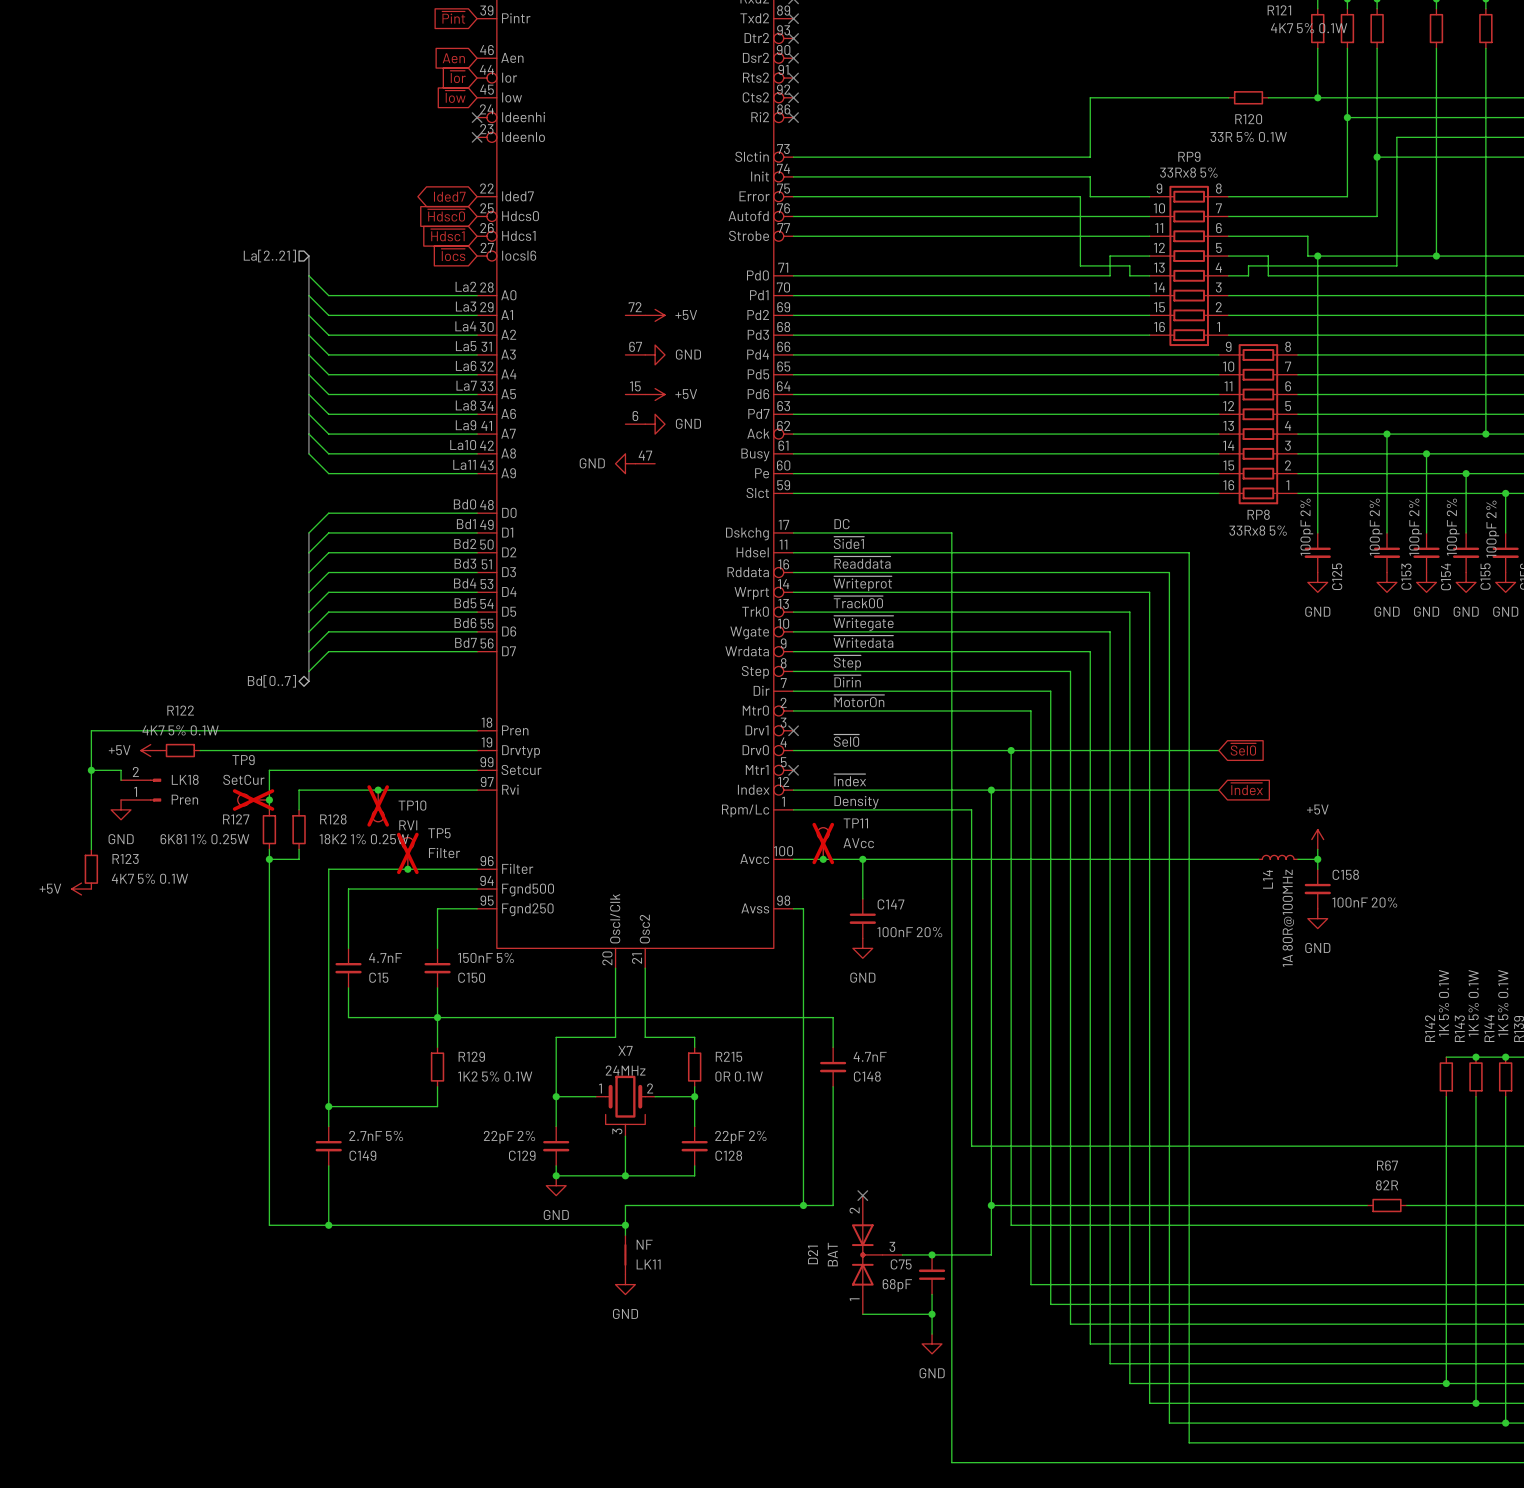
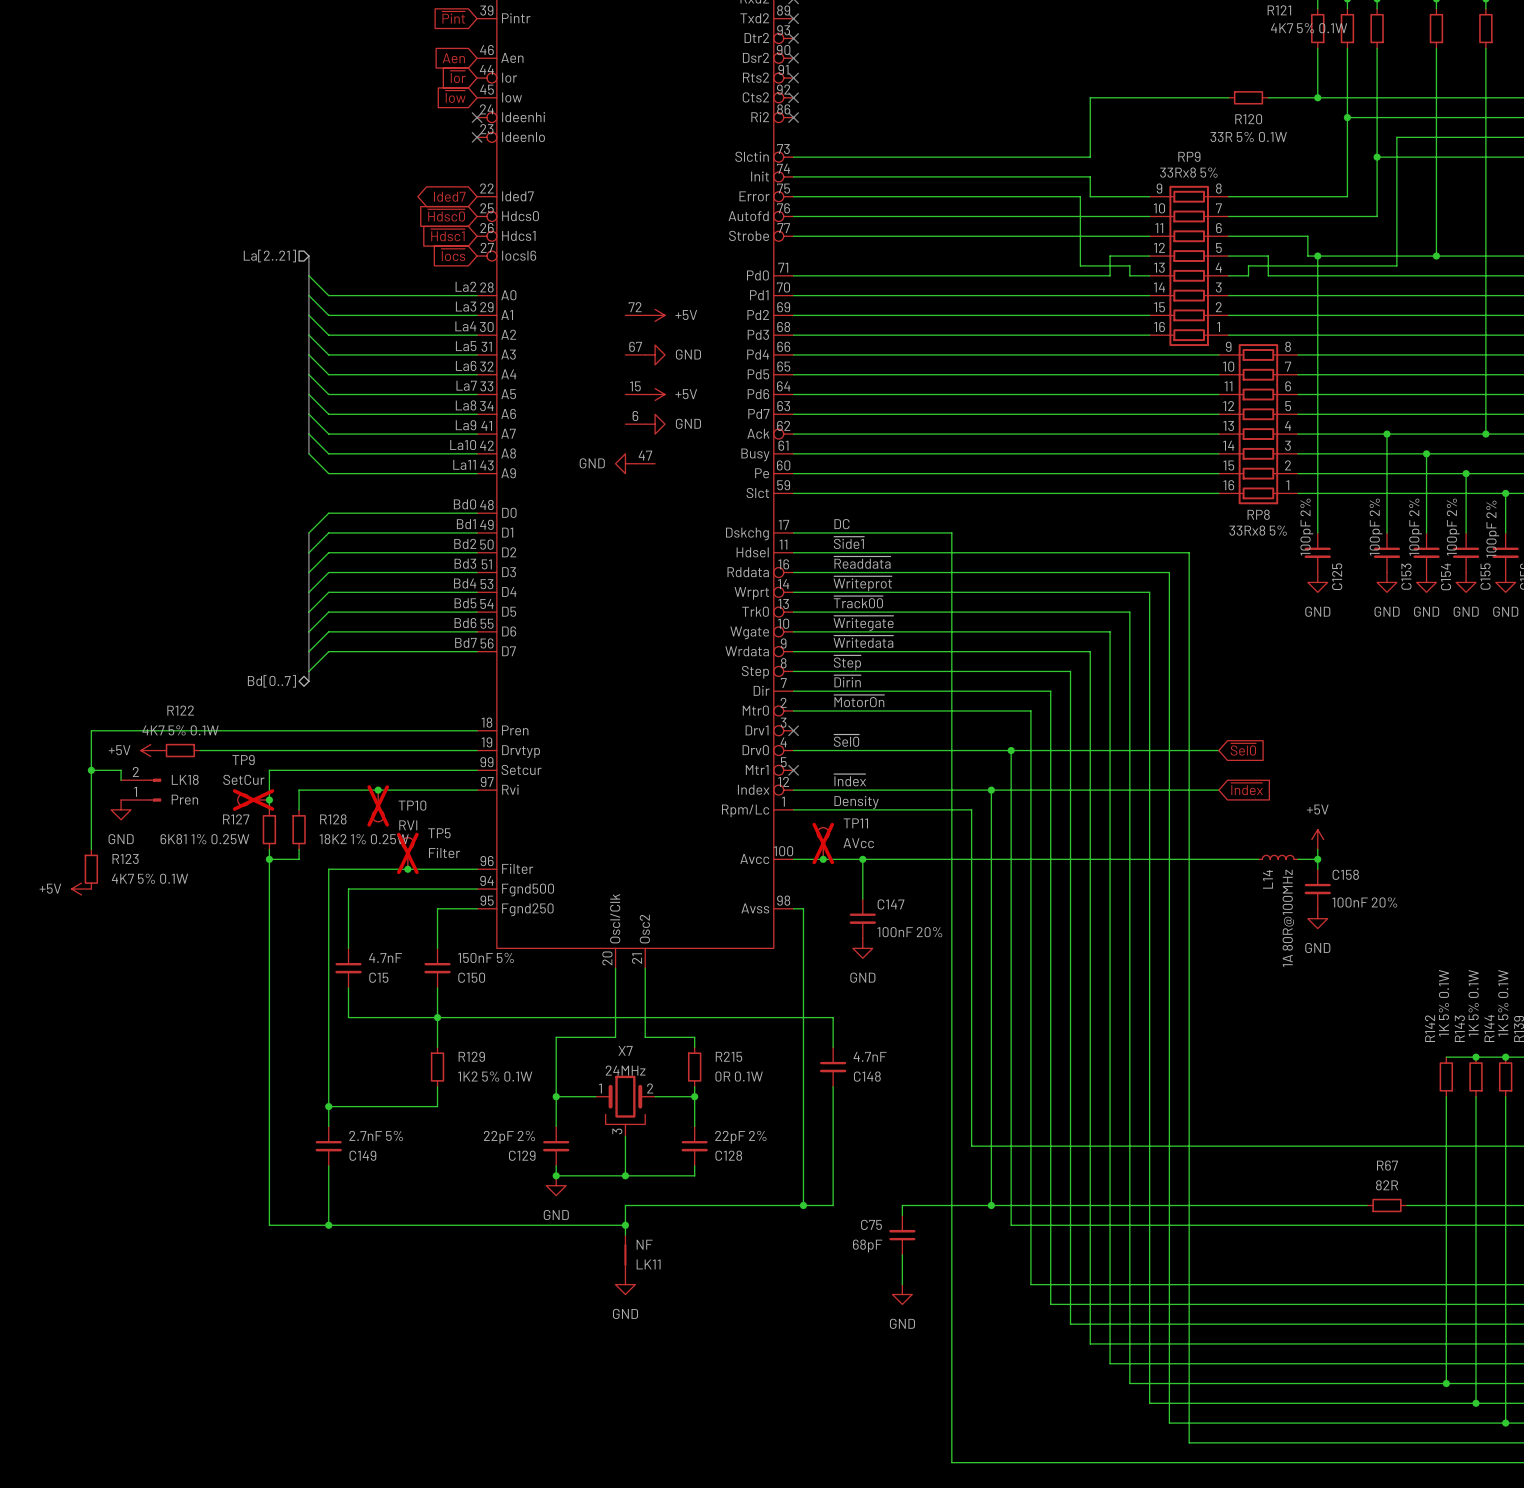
no-connect mark: (862, 1195) -> none
wire: (991, 1205) (991, 1254) (902, 1254) -> (991, 1205) (902, 1205) (902, 1215)
D21: BAT (877, 1254) -> none
wire: none -> (902, 1254) (902, 1284)
junction: (932, 1254) -> none
C75 position: (932, 1274) -> (902, 1235)
wire: (932, 1294) (932, 1334) -> none
wire: (862, 1314) (932, 1314) -> none
junction: (932, 1314) -> none
power symbol position: GND (932, 1343) -> GND (902, 1294)

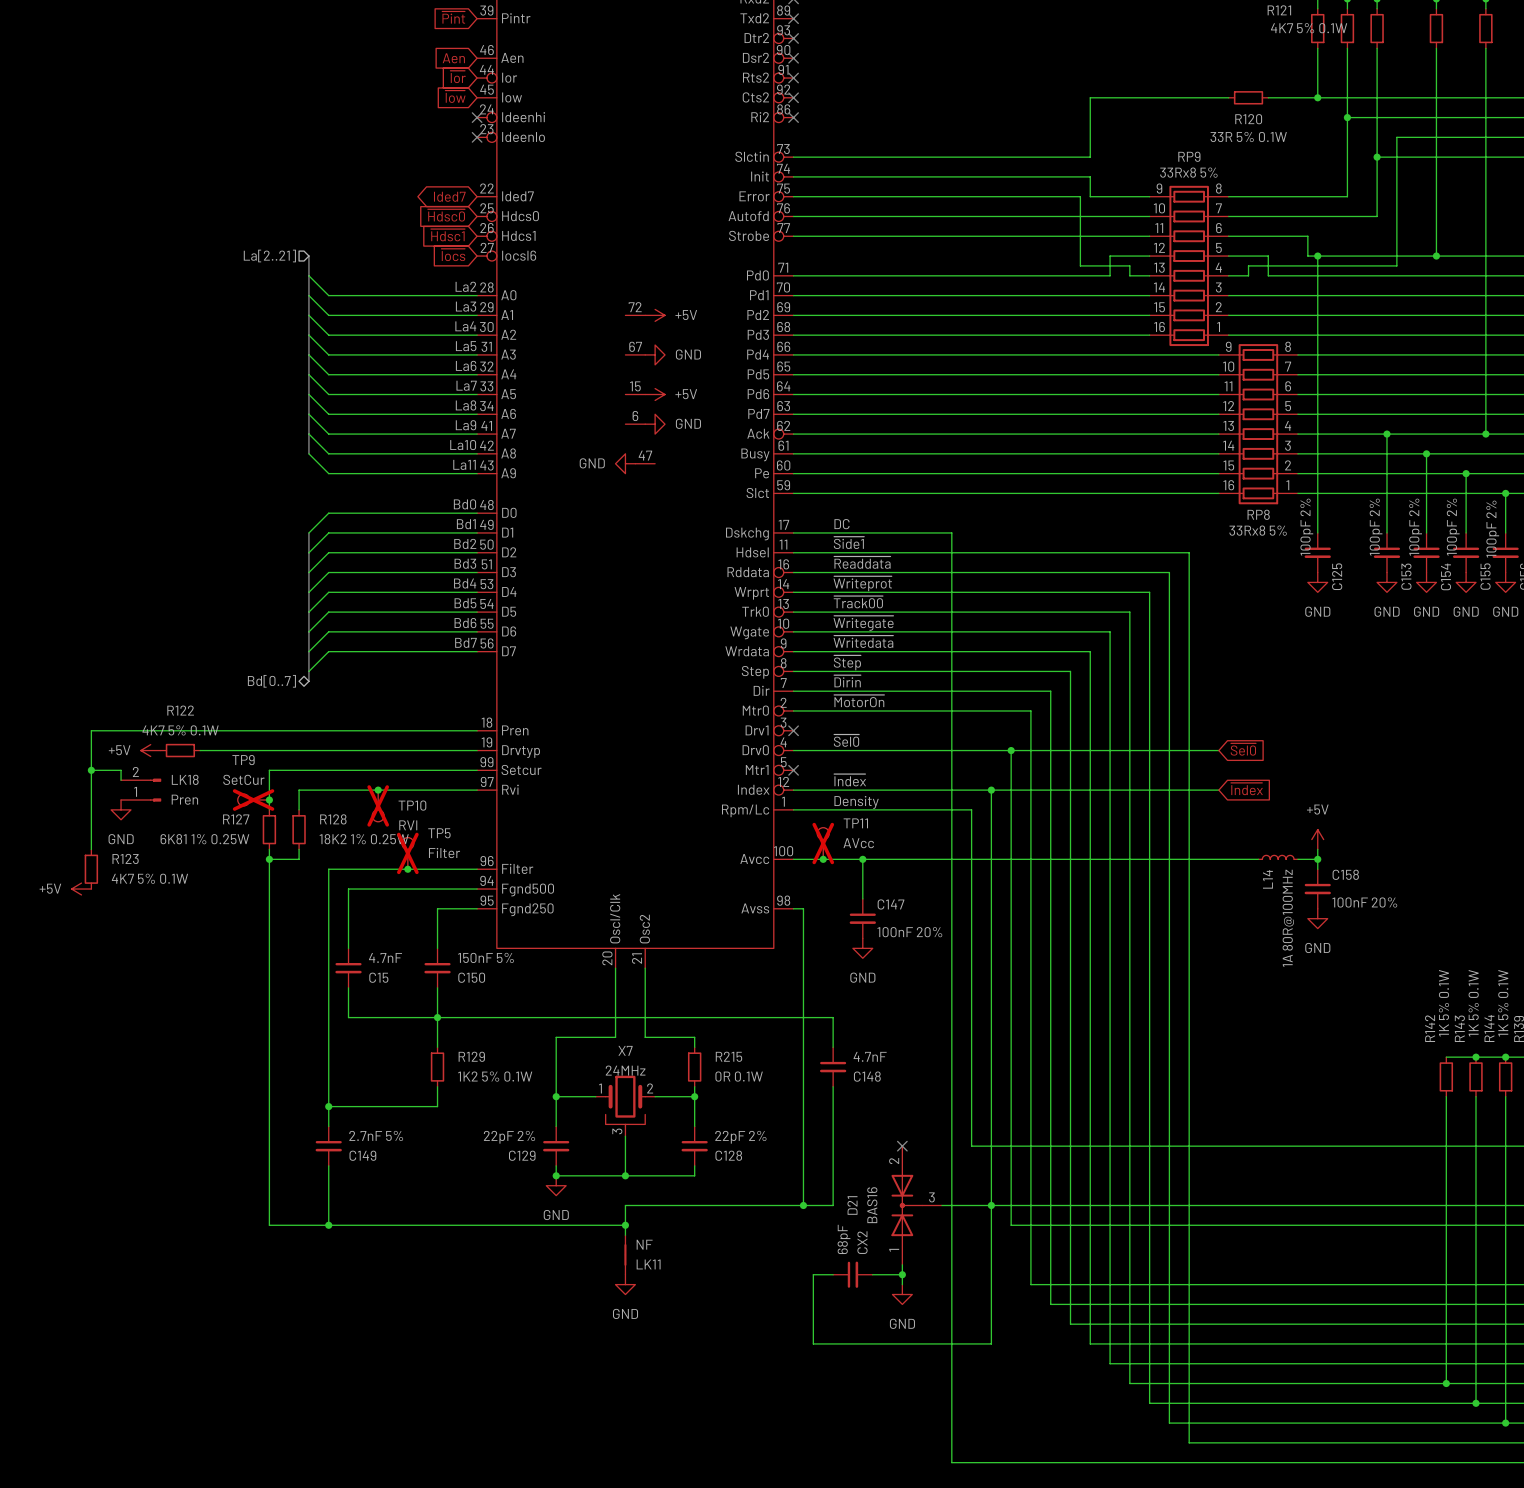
no-connect mark: none -> (902, 1146)
D21: none -> BAS16 (916, 1205)
wire: none -> (991, 1205) (991, 1343) (813, 1343) (813, 1274) (833, 1274)
wire: none -> (1367, 1205) (1406, 1205)
R67: 82R (1386, 1205) -> none
C75: 68pF (902, 1235) -> none
CX2: none -> 68pF (852, 1274)
wire: none -> (872, 1274) (902, 1274)
junction: none -> (902, 1274)

